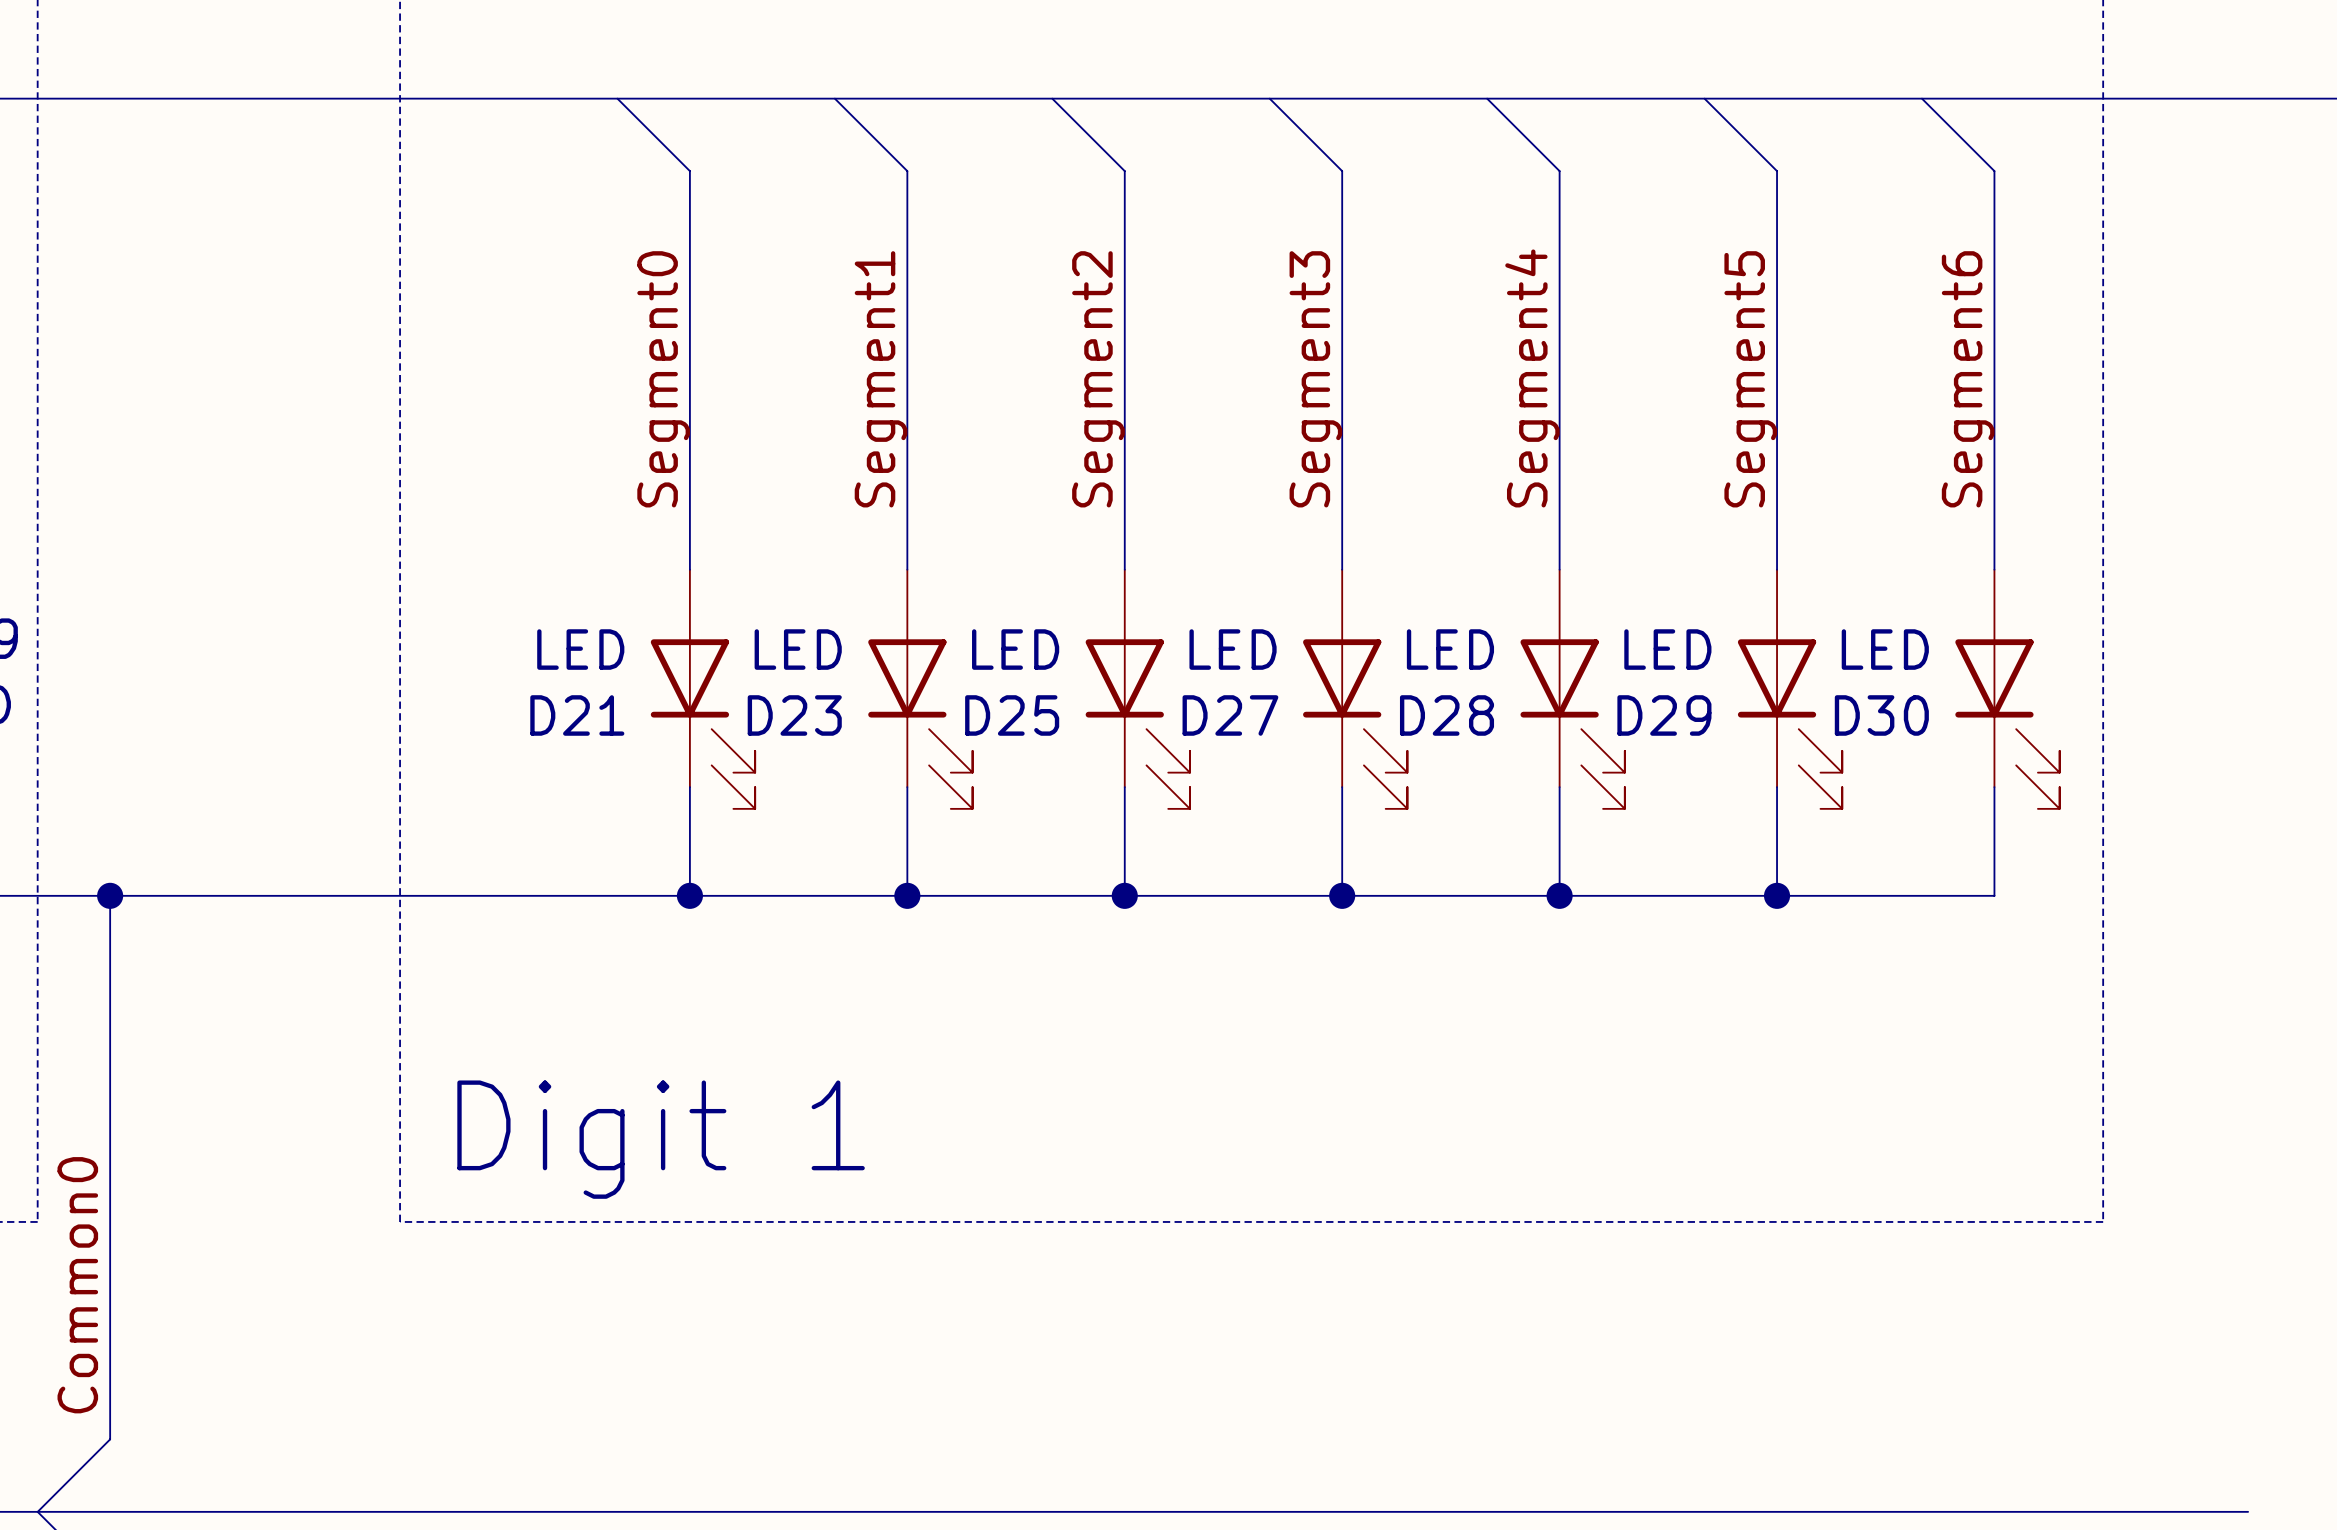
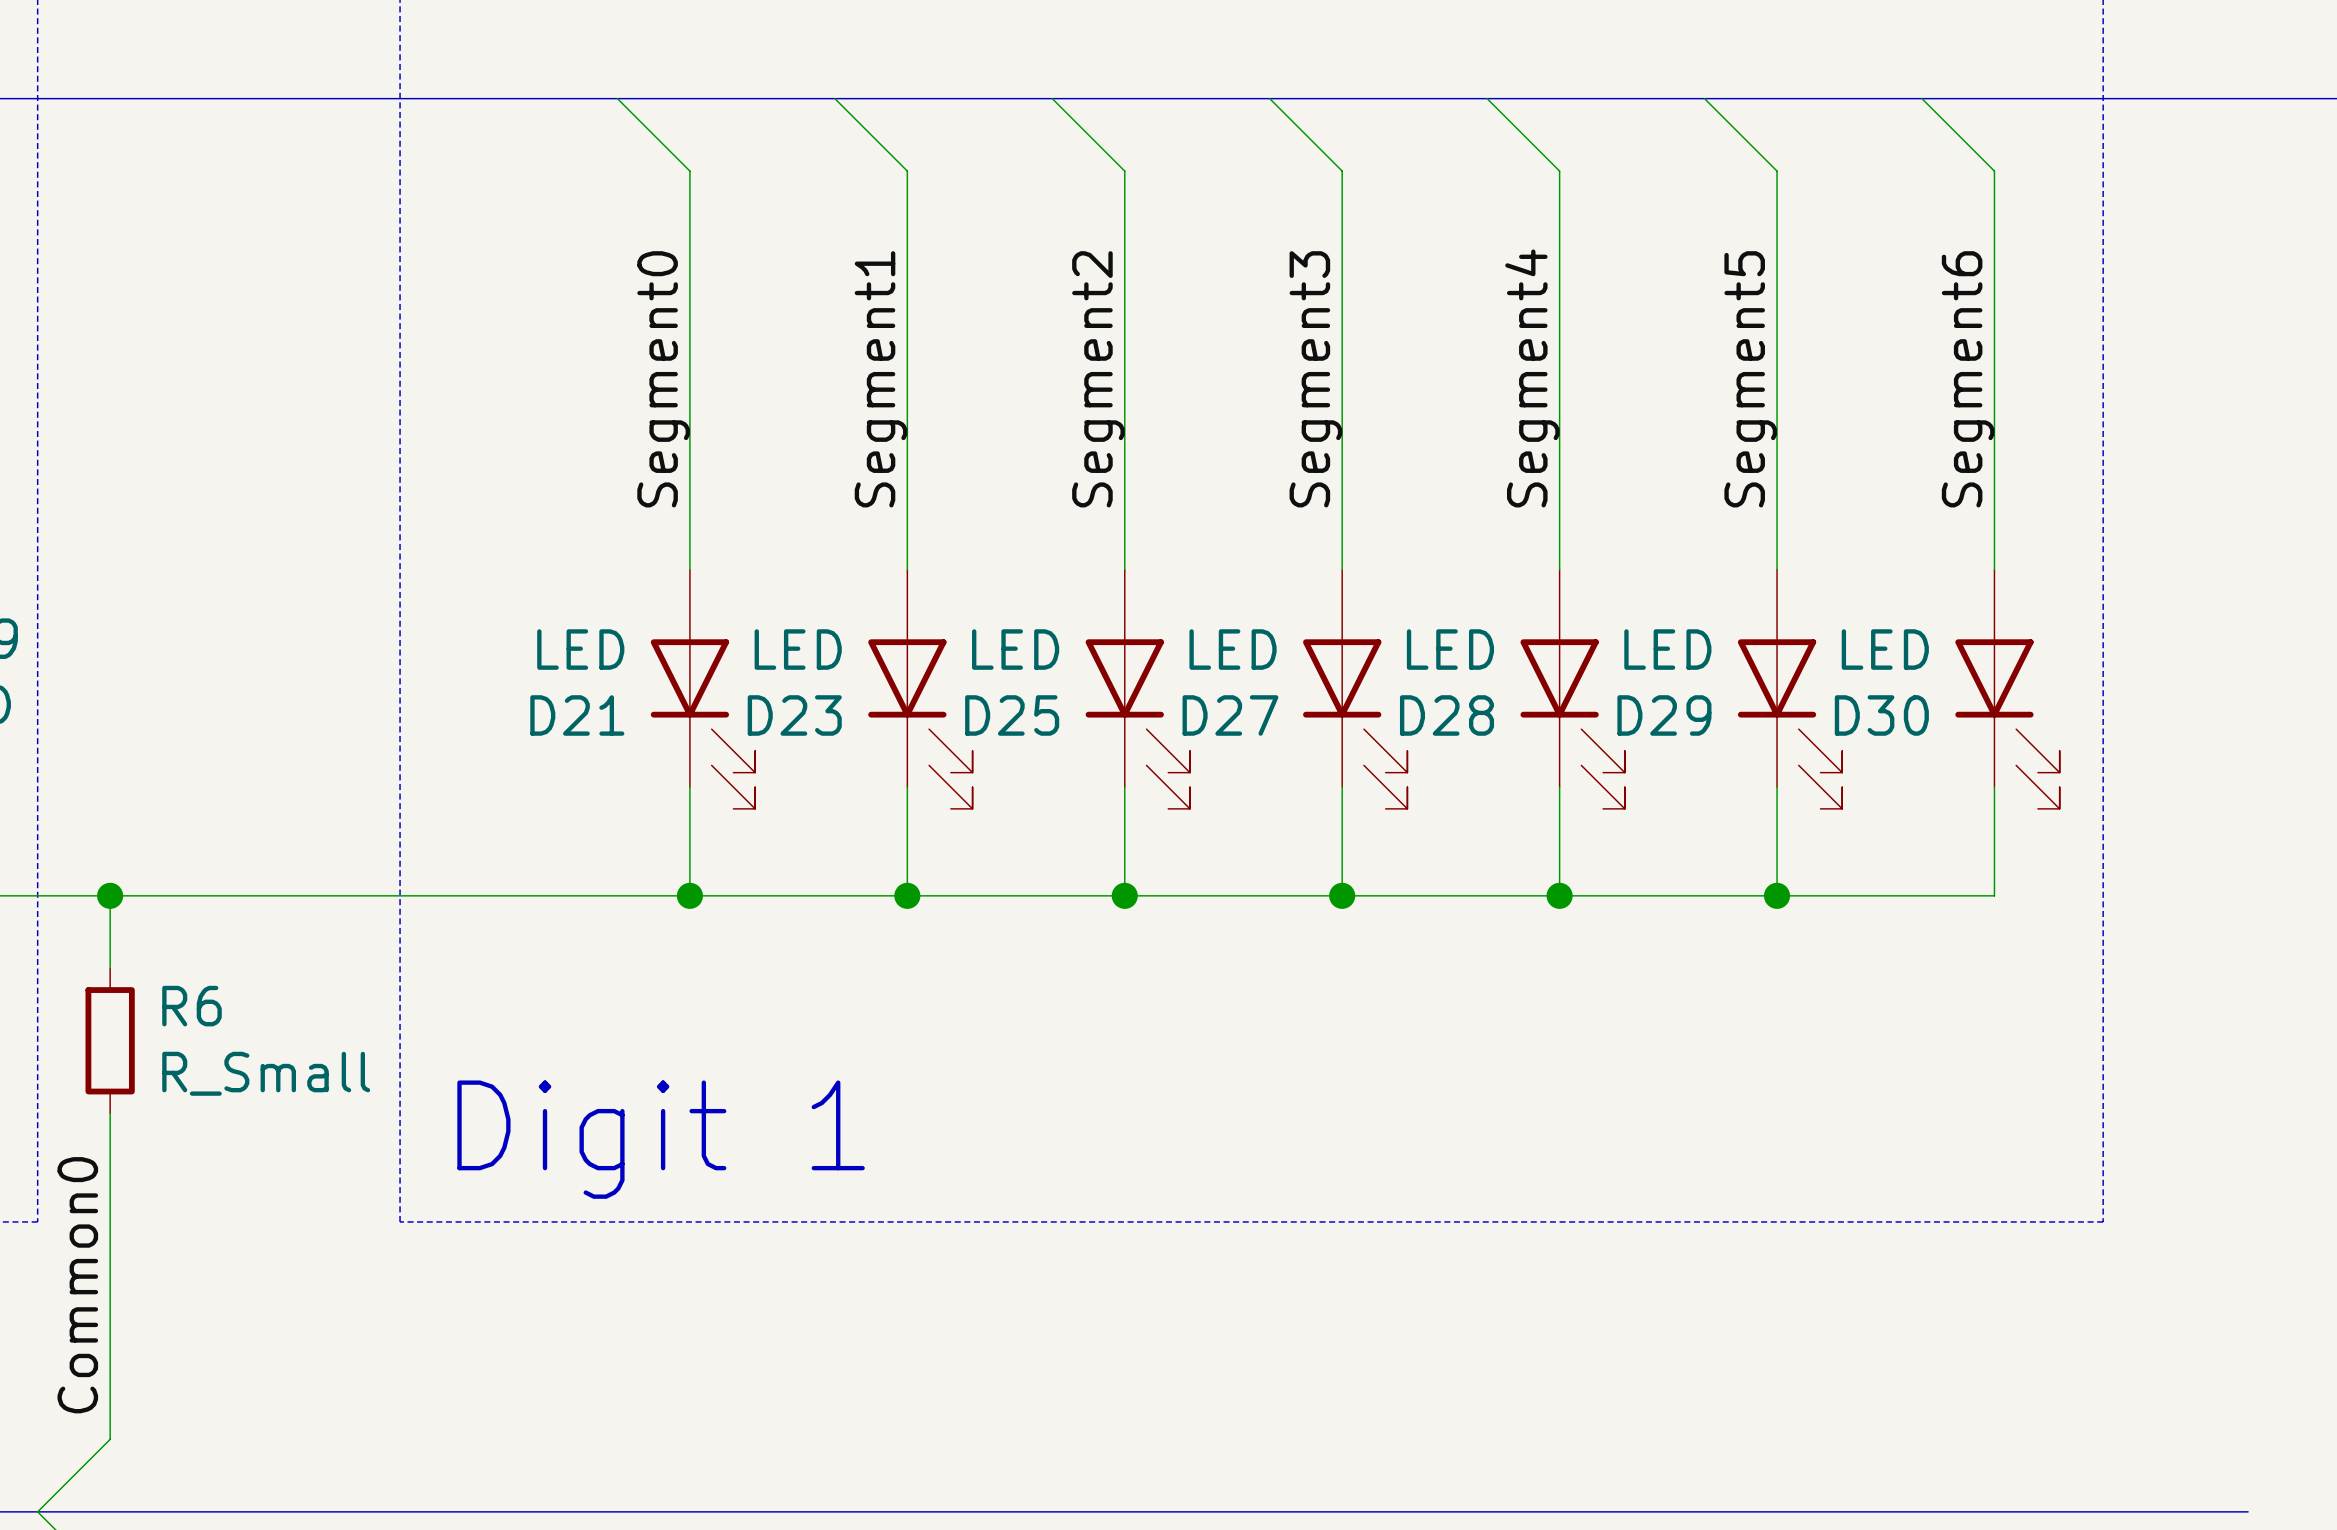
wire: (110, 968) (110, 1113) -> none
R6: none -> R_Small (110, 1040)

